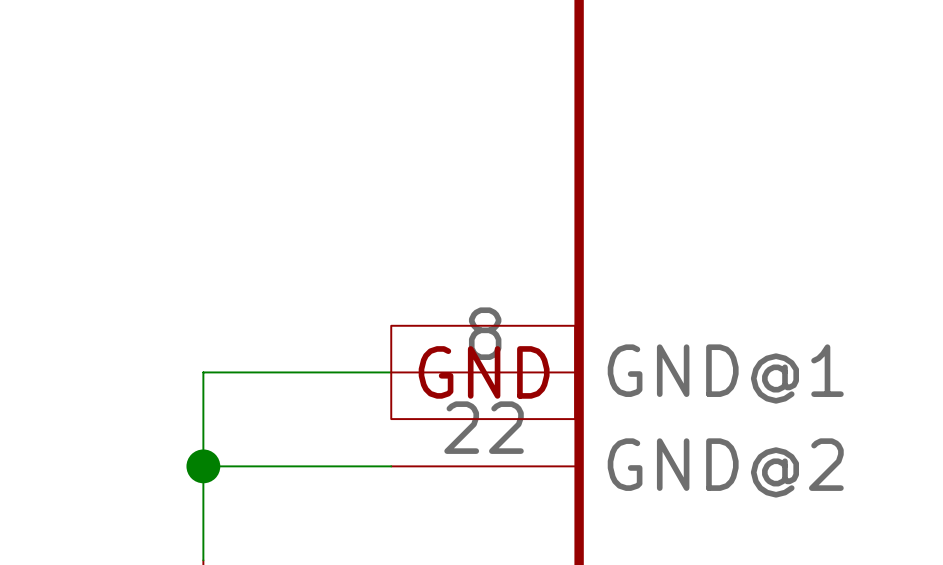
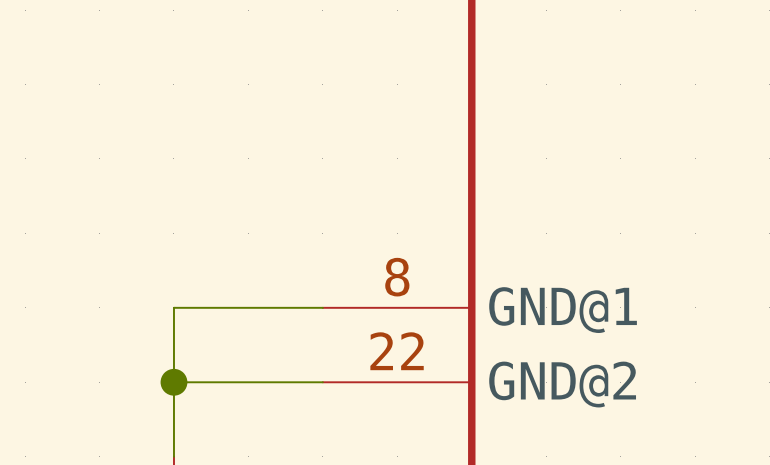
global label: GND (484, 372) -> none

